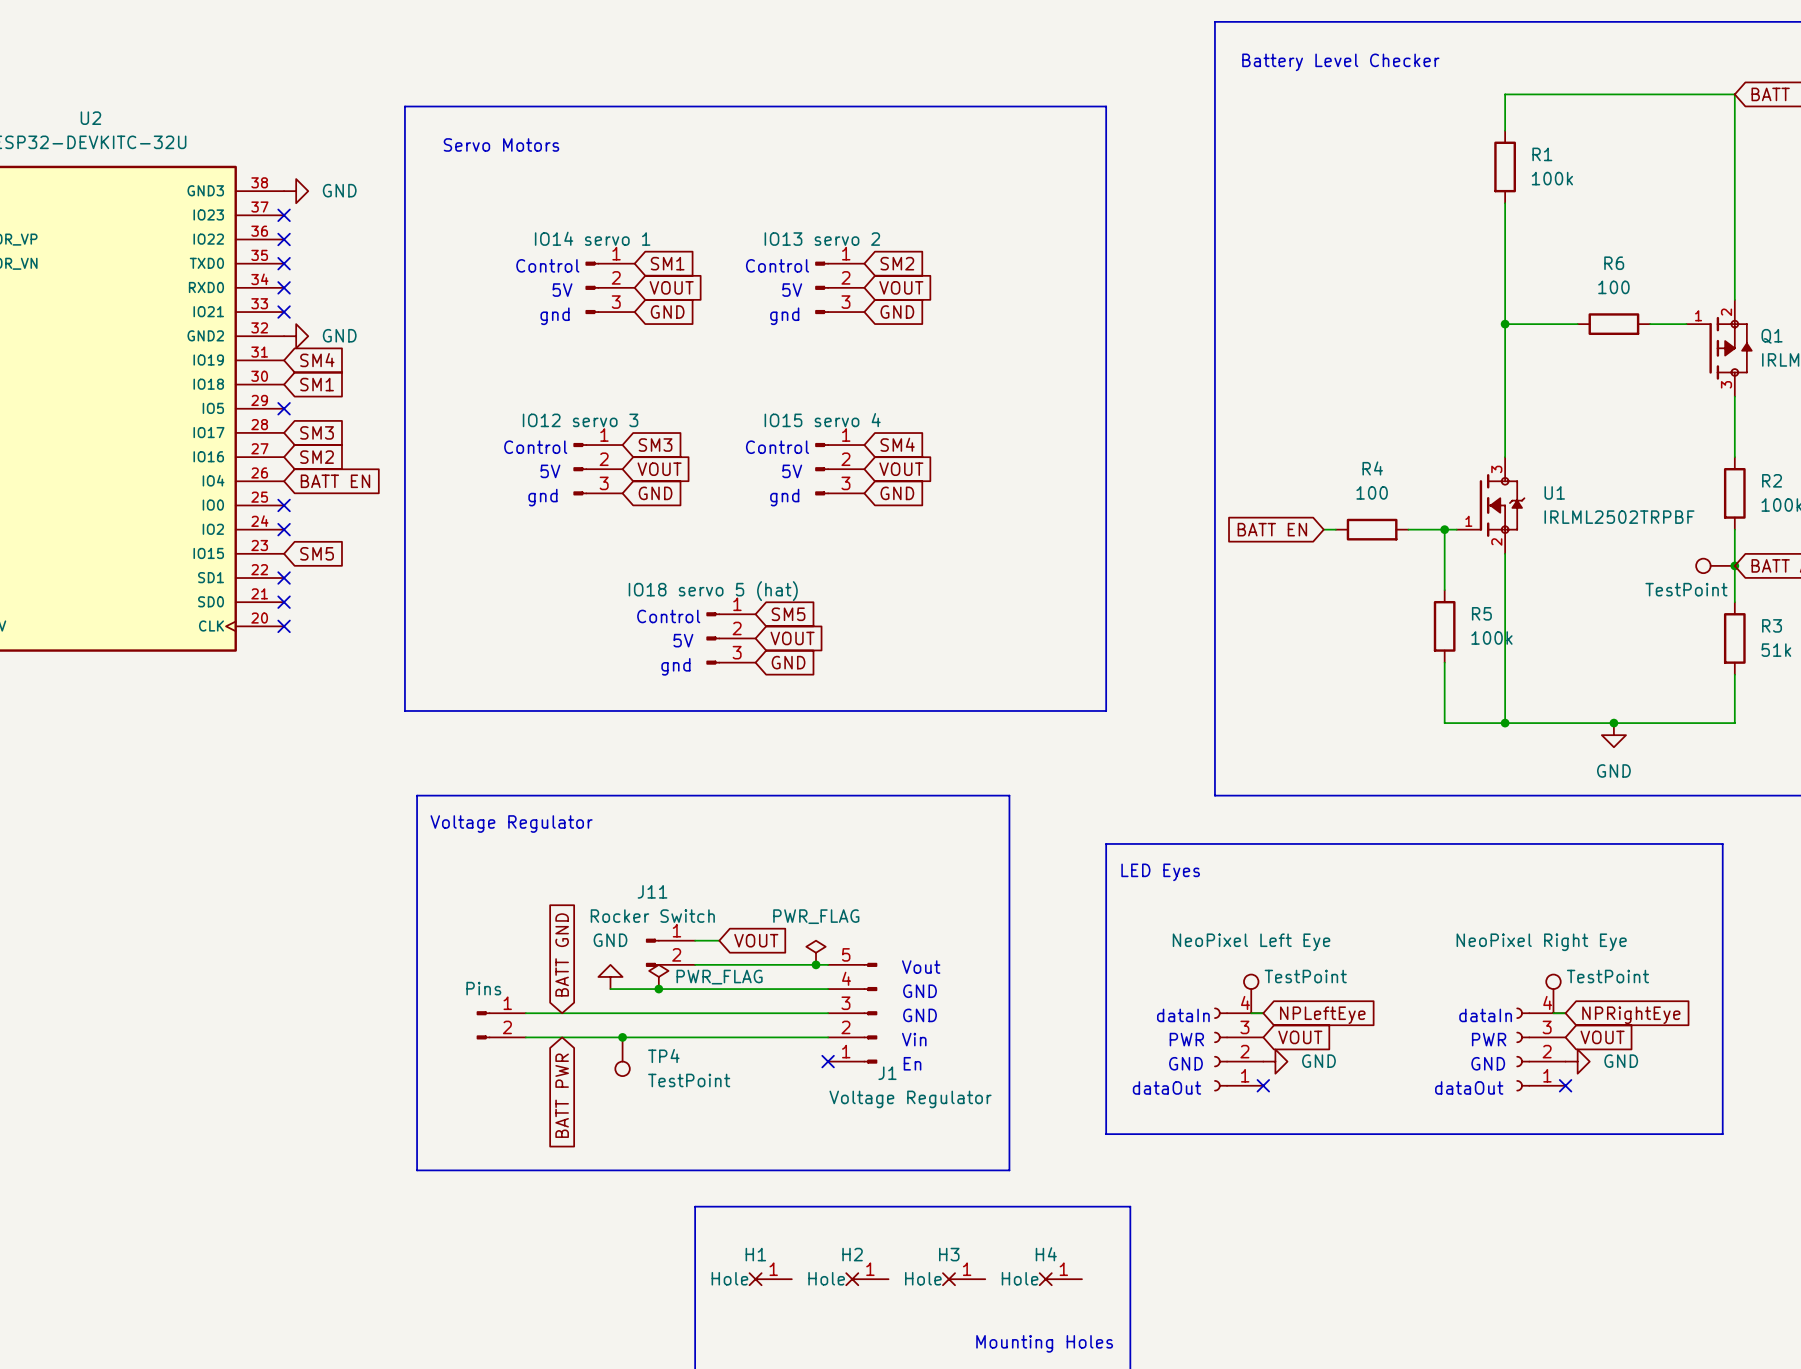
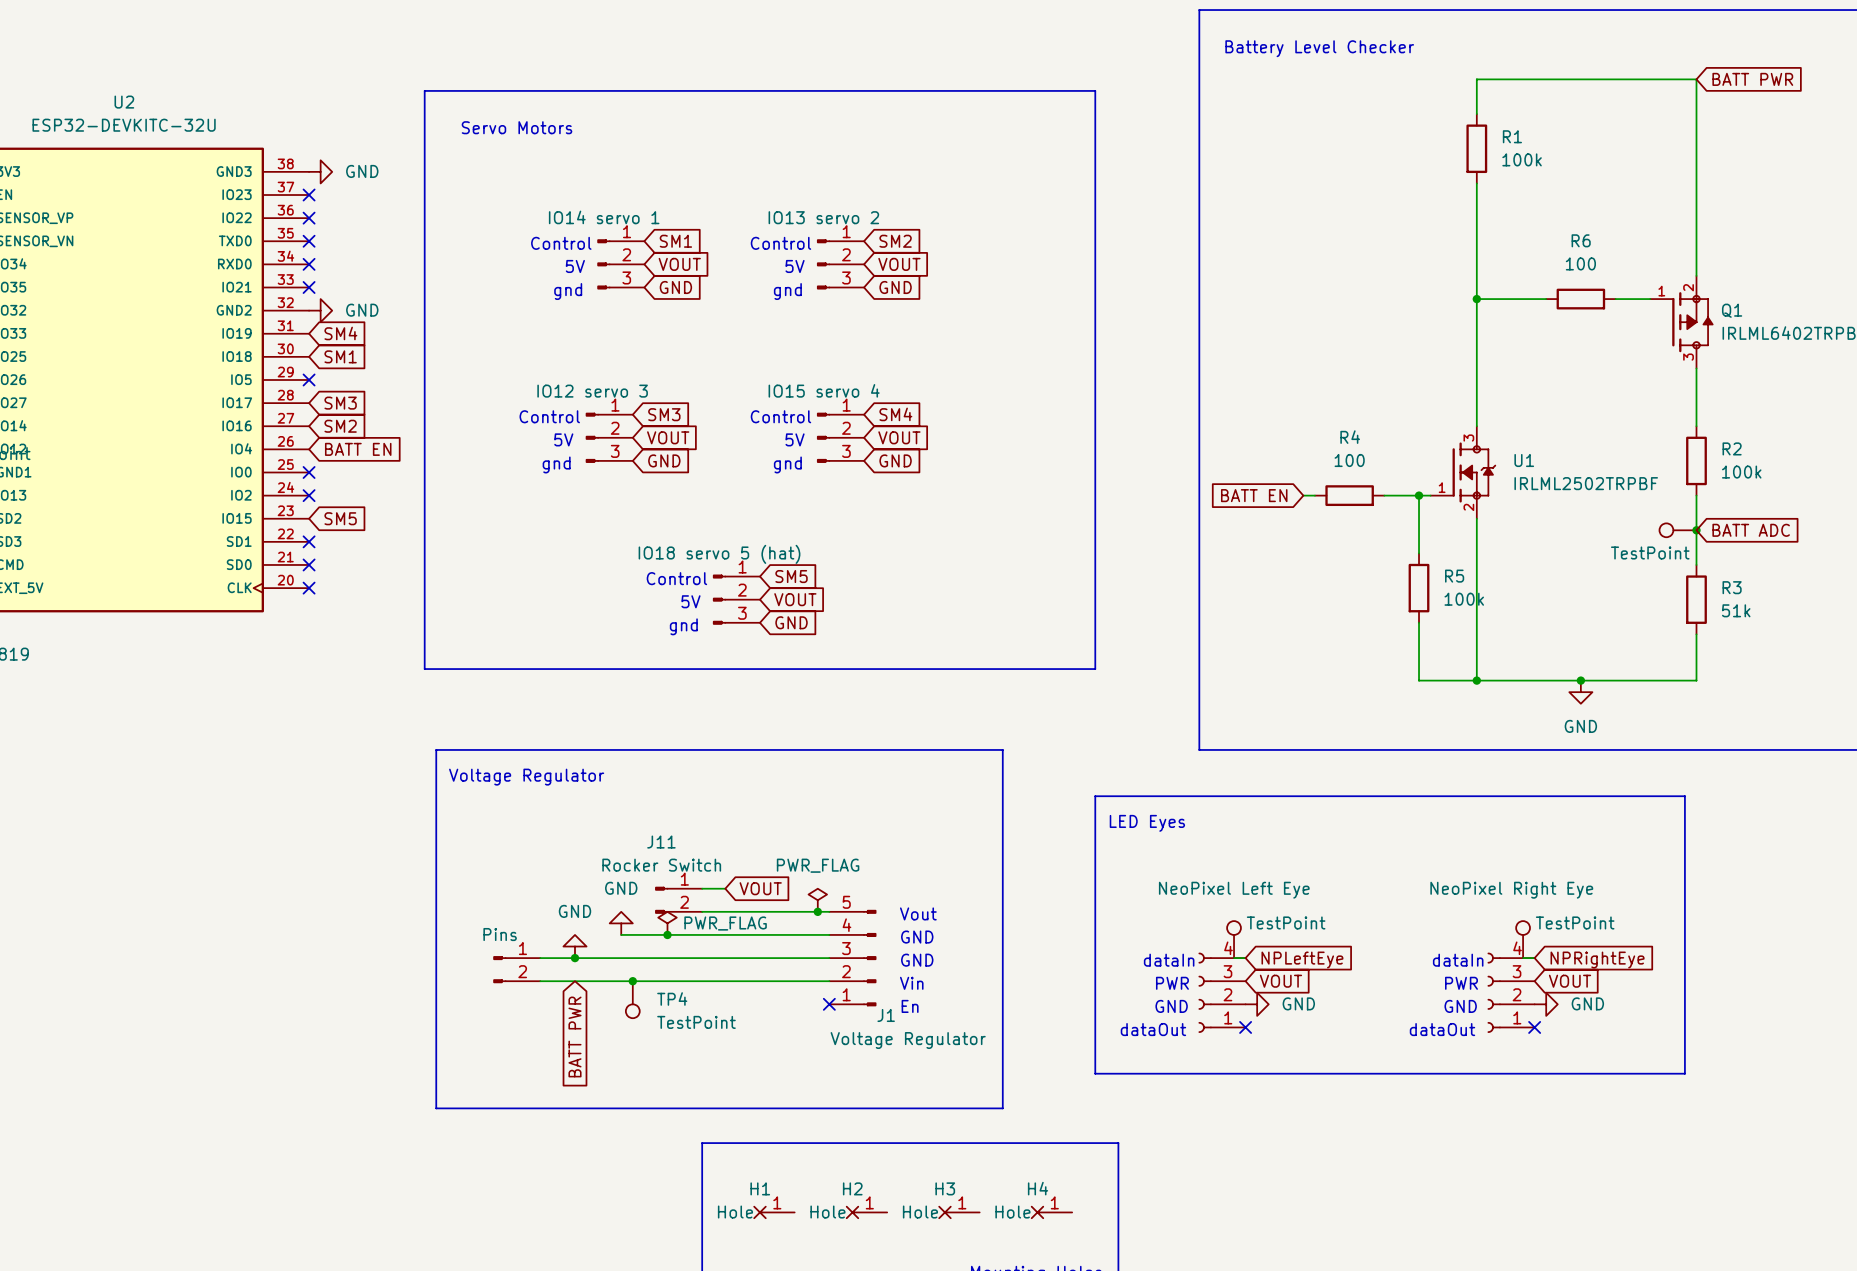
global label: BATT GND (562, 954) -> none
power symbol: none -> GND (574, 946)
junction: none -> (574, 958)

